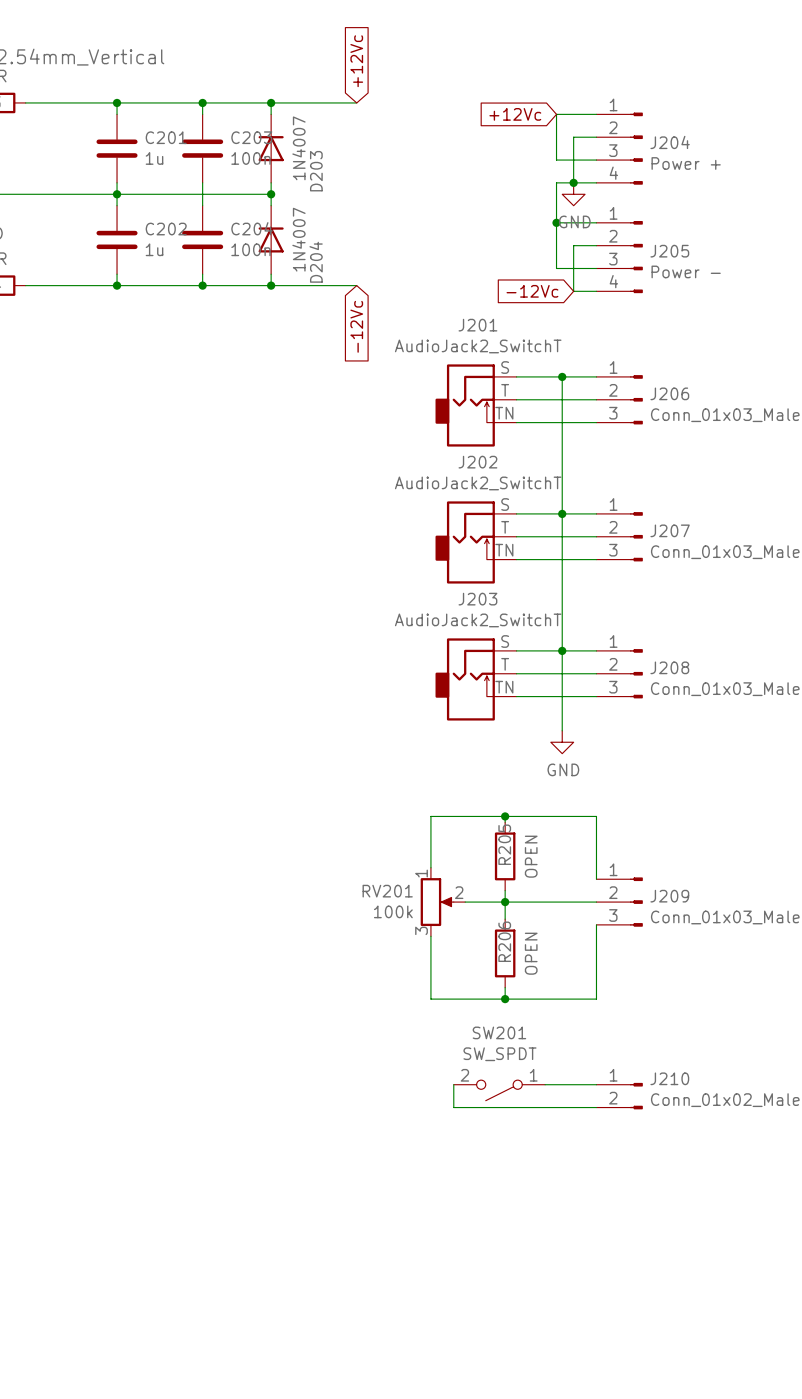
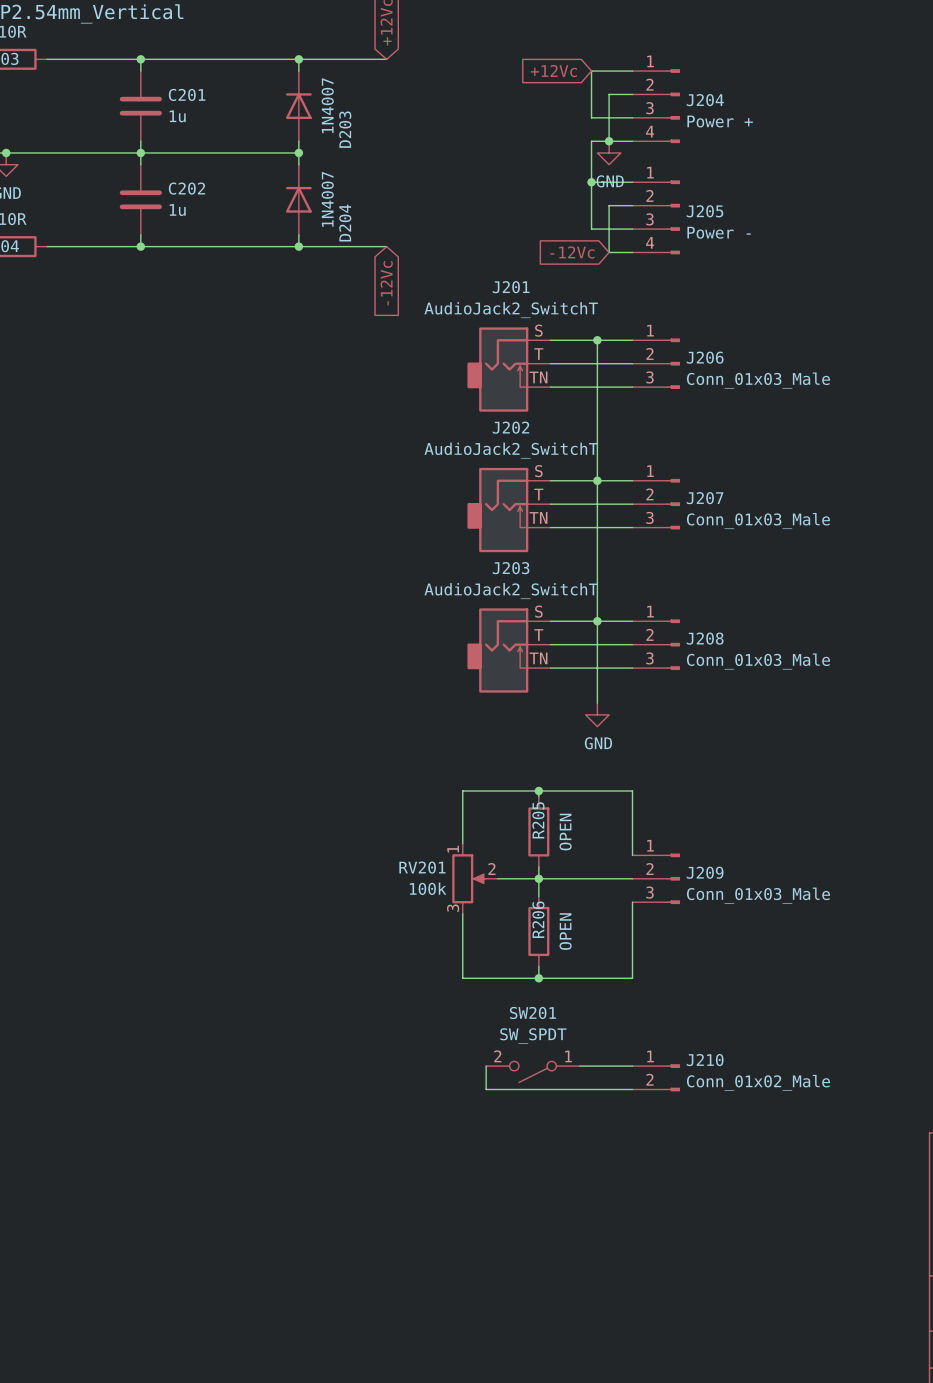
wire: (202, 102) (202, 114) -> none
junction: (202, 102) -> none
C203: 100n (202, 148) -> none
wire: (202, 182) (202, 205) -> none
C204: 100n (202, 239) -> none
wire: (202, 274) (202, 285) -> none
junction: (202, 285) -> none

